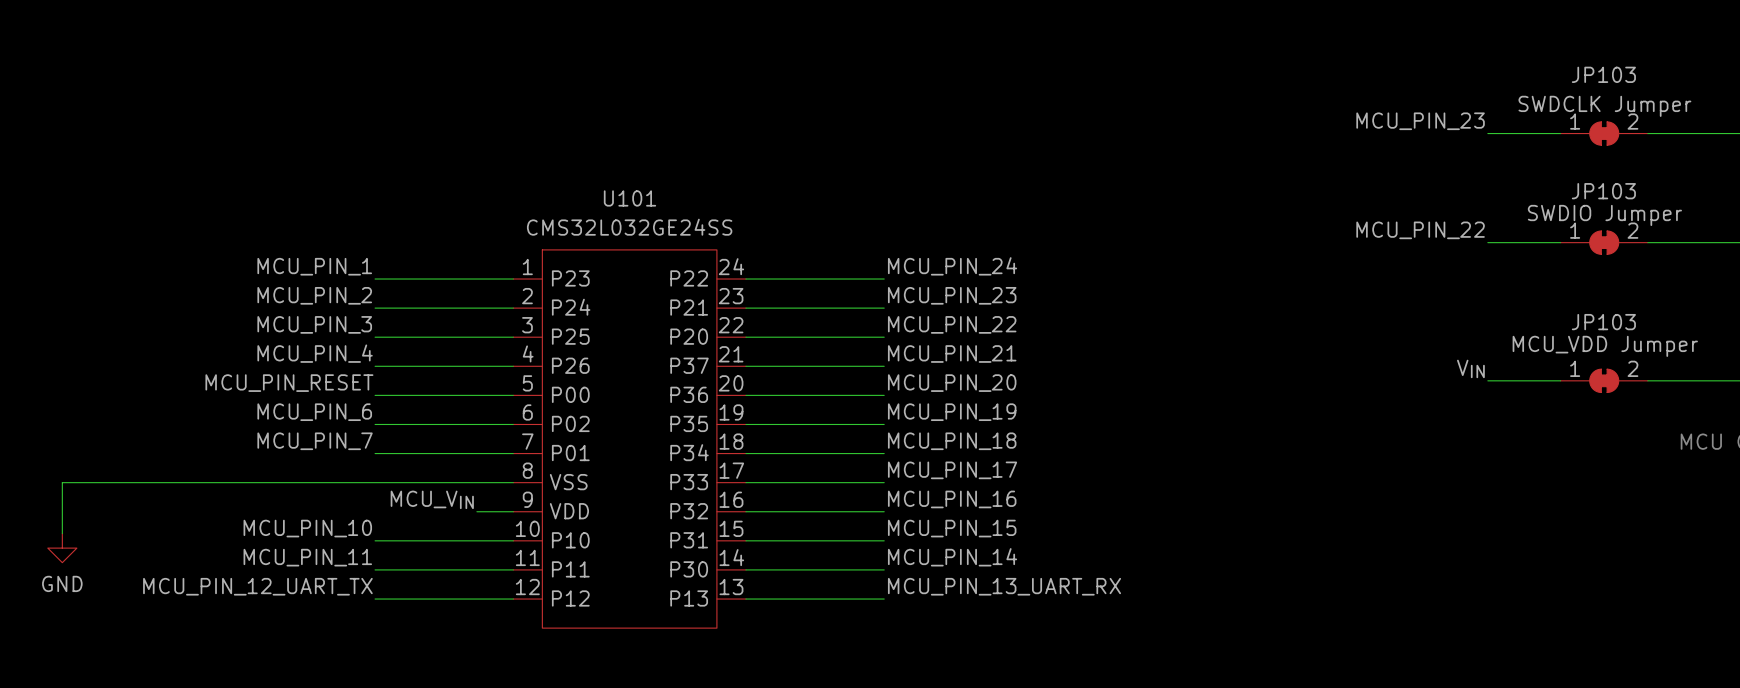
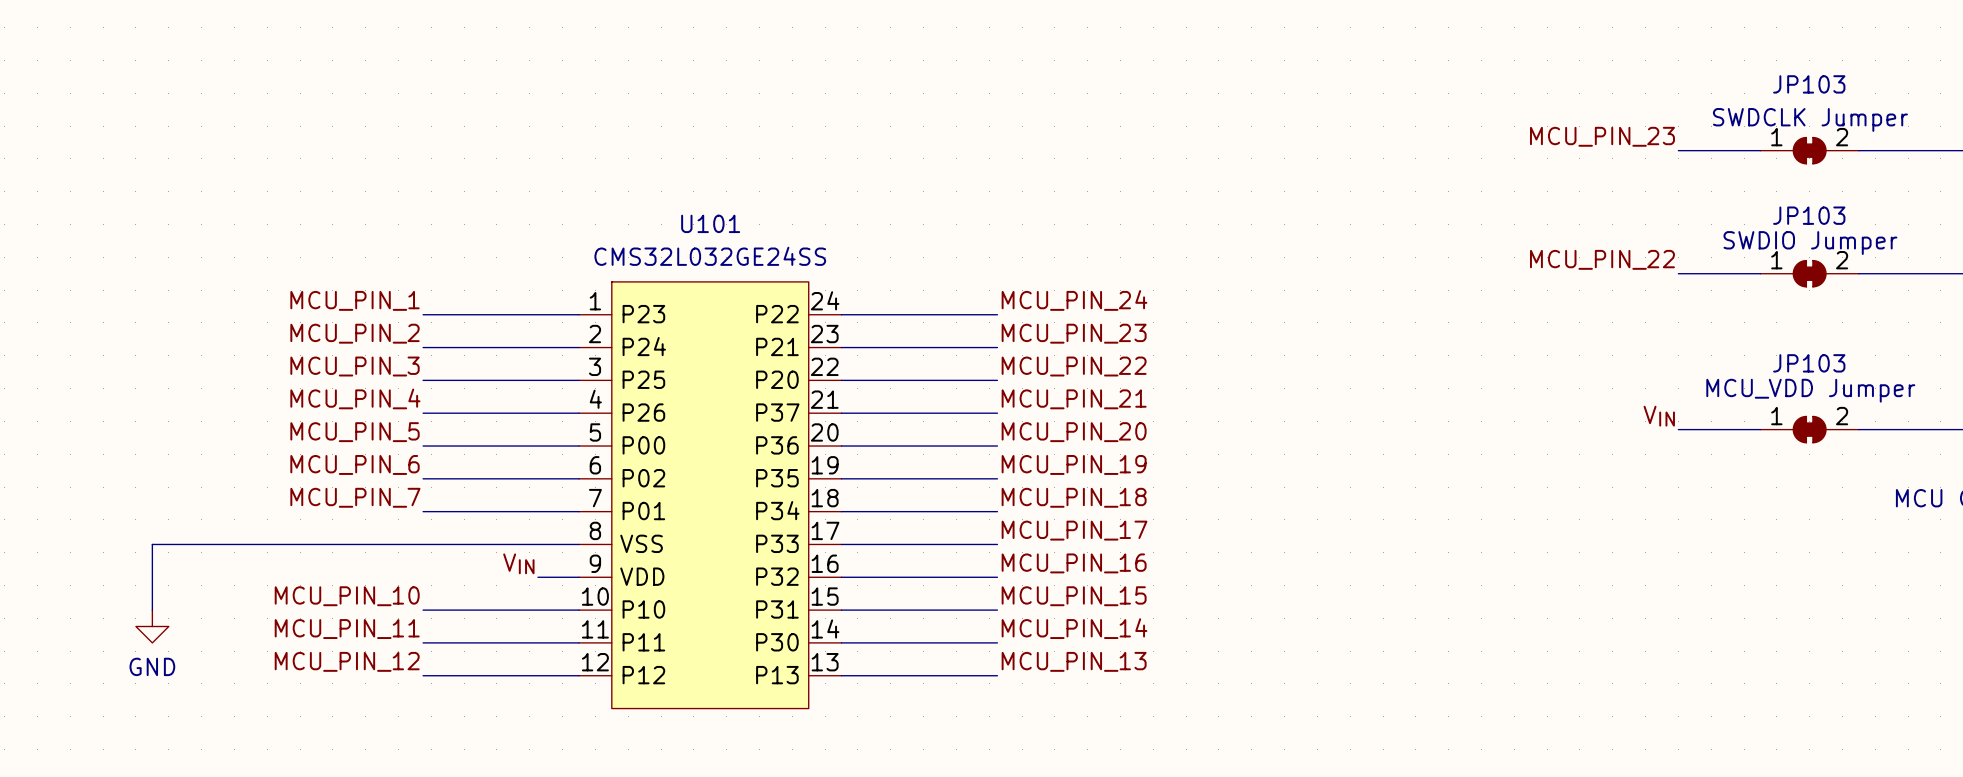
label: MCU_PIN_RESET (289, 383) -> MCU_PIN_5 (355, 432)
wire: (135, 482) (62, 482) (62, 533) -> (152, 544) (152, 610)
label: MCU_VIN (432, 499) -> VIN (518, 563)
power symbol position: GND (62, 548) -> GND (152, 626)
label: MCU_PIN_12_UART_TX (257, 586) -> MCU_PIN_12 (347, 661)
label: MCU_PIN_13_UART_RX (1004, 586) -> MCU_PIN_13 (1074, 661)

